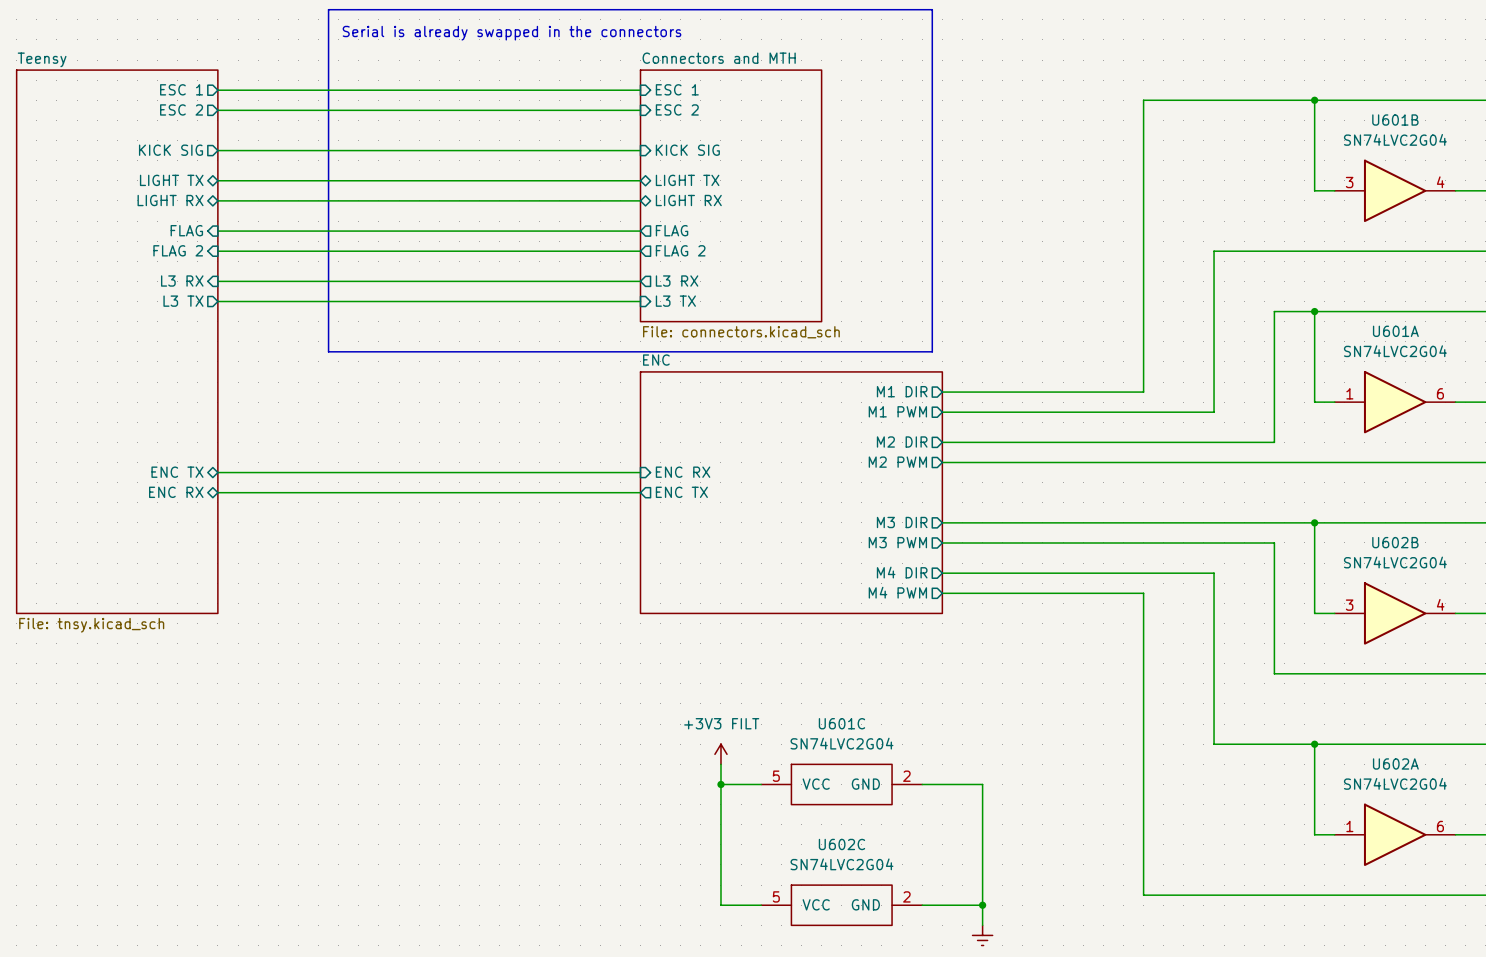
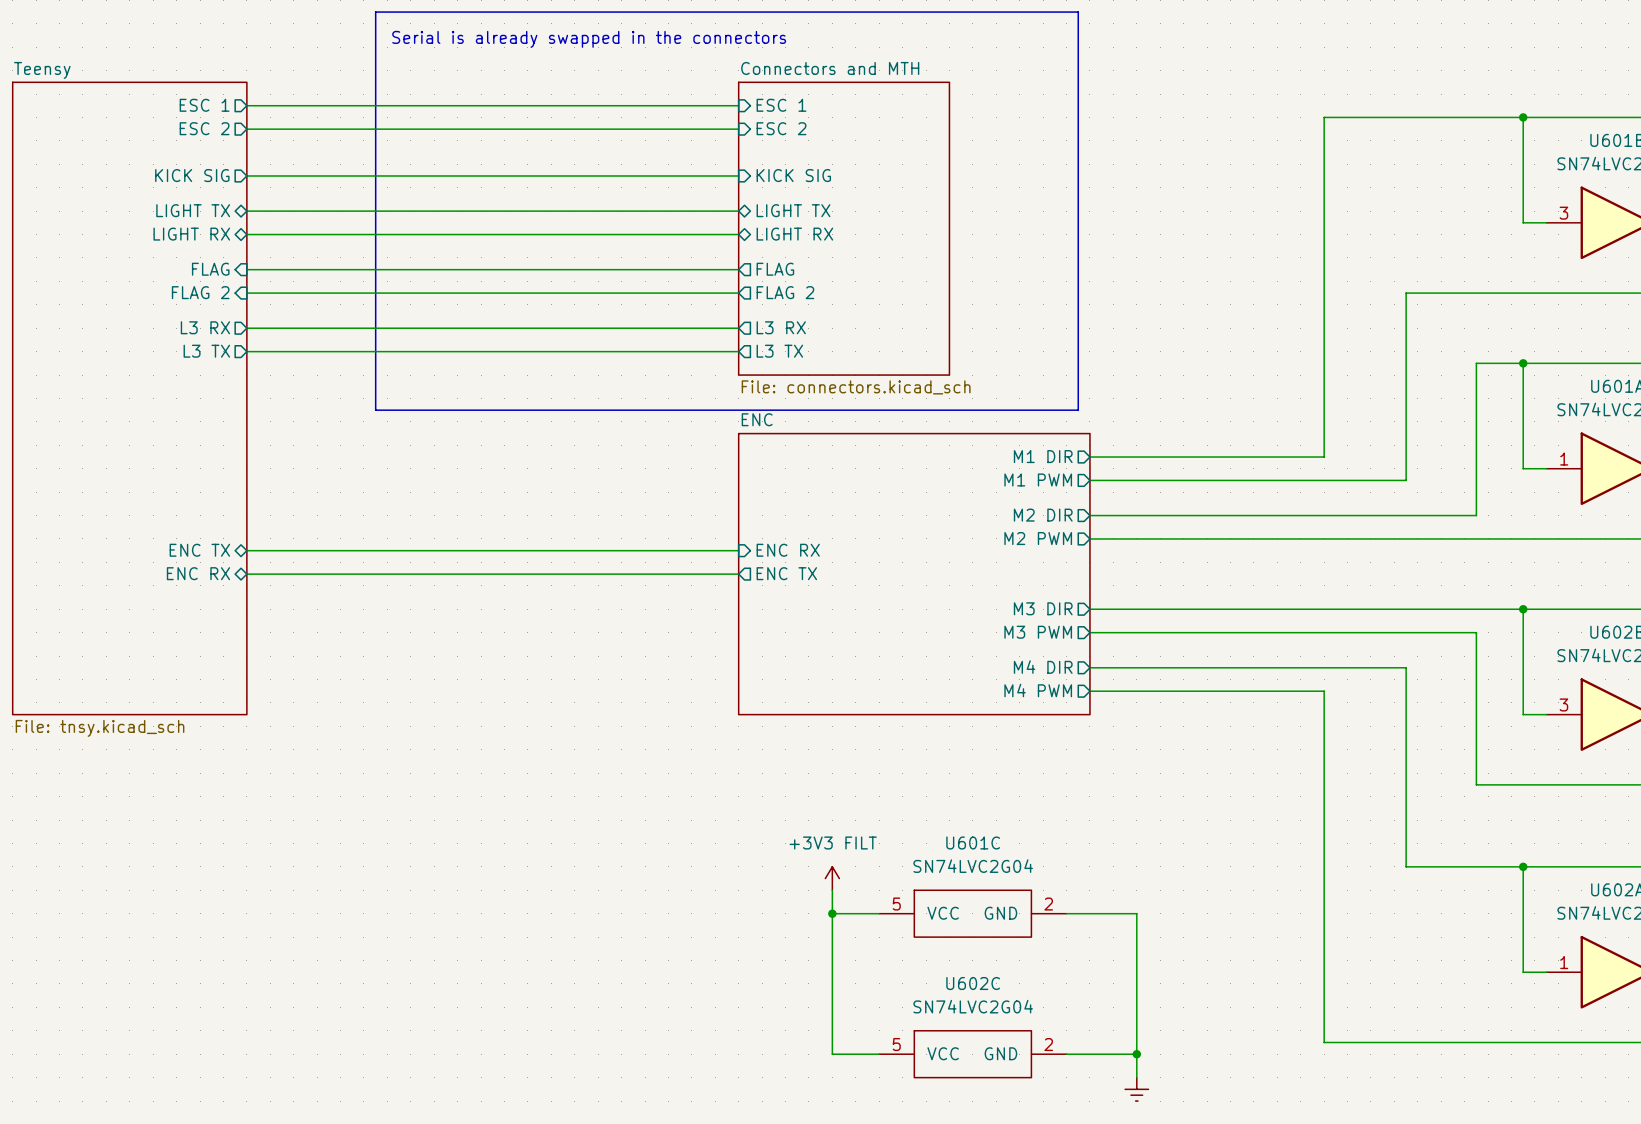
sheet pin shape: input (182, 281) -> output (205, 327)
sheet pin shape: input (675, 301) -> output (779, 351)

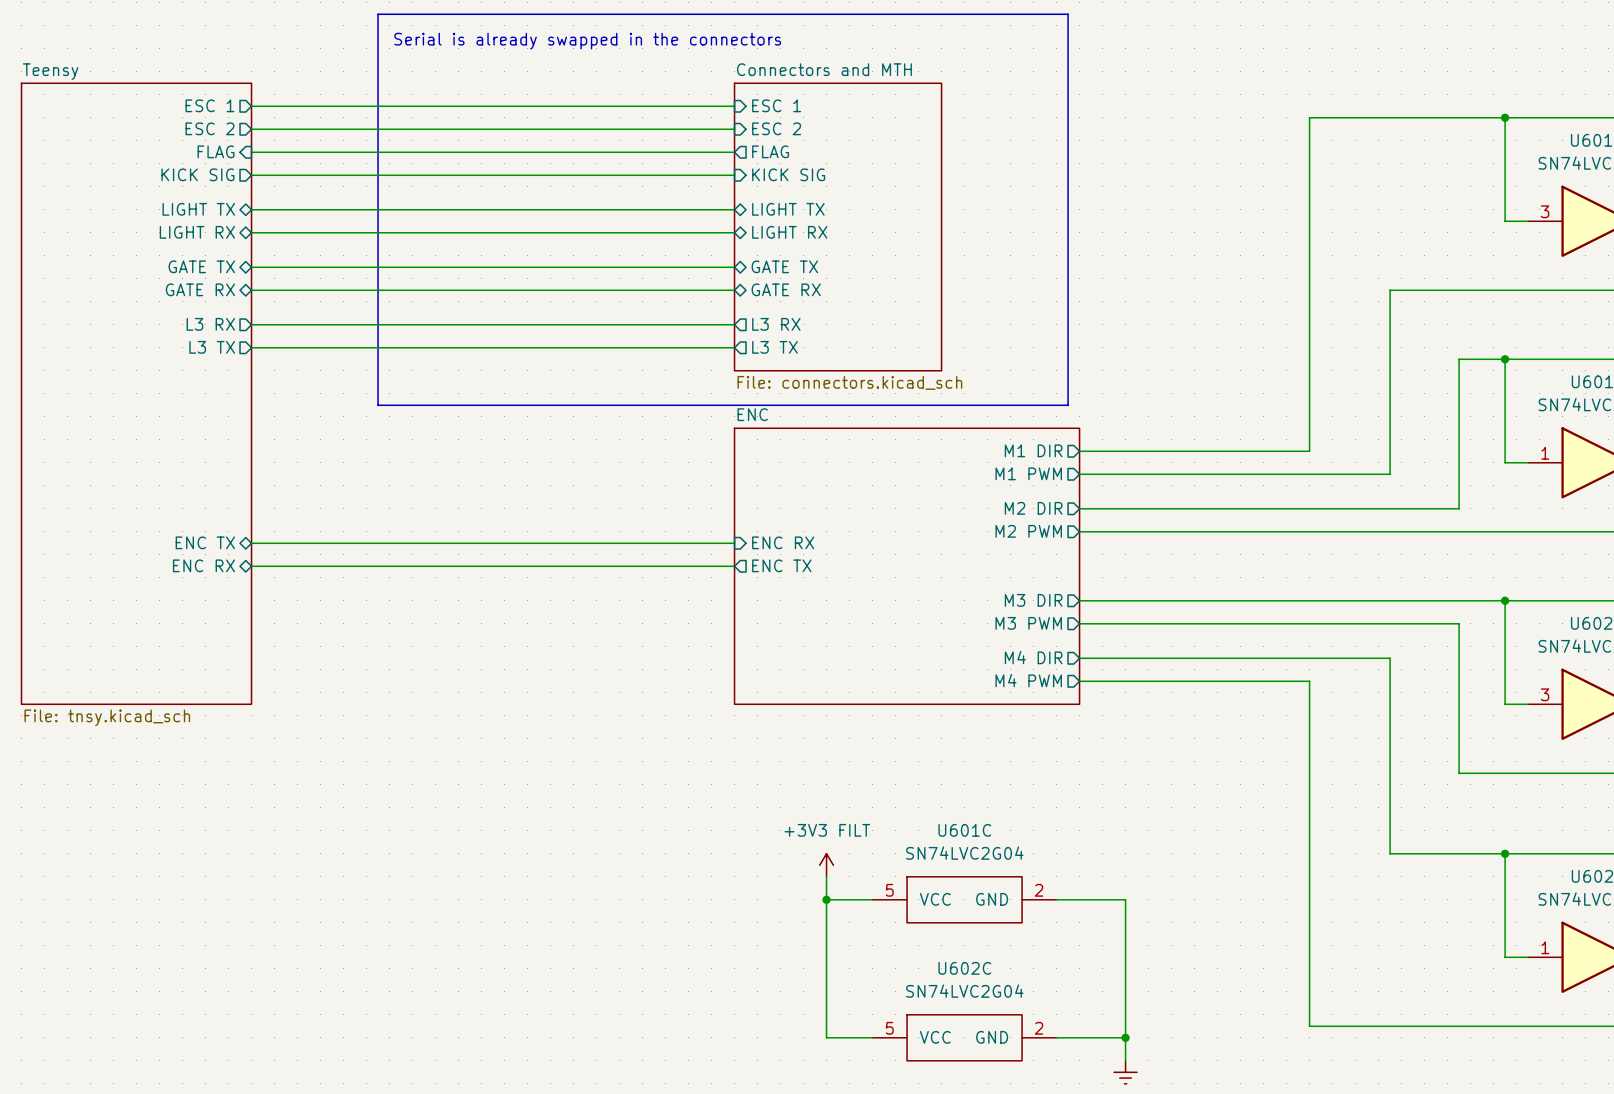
sheet pin: none -> FLAG (216, 151)
wire: none -> (251, 152) (734, 152)
sheet pin: none -> FLAG (770, 151)
sheet pin shape: input (210, 269) -> bidirectional (201, 266)
sheet pin: FLAG (210, 269) -> GATE TX (201, 266)
sheet pin shape: output (775, 269) -> bidirectional (784, 266)
sheet pin: FLAG (775, 269) -> GATE TX (784, 266)
sheet pin shape: input (200, 292) -> bidirectional (200, 289)
sheet pin: FLAG 2 (200, 292) -> GATE RX (200, 289)
sheet pin shape: output (785, 292) -> bidirectional (786, 289)
sheet pin: FLAG 2 (785, 292) -> GATE RX (786, 289)

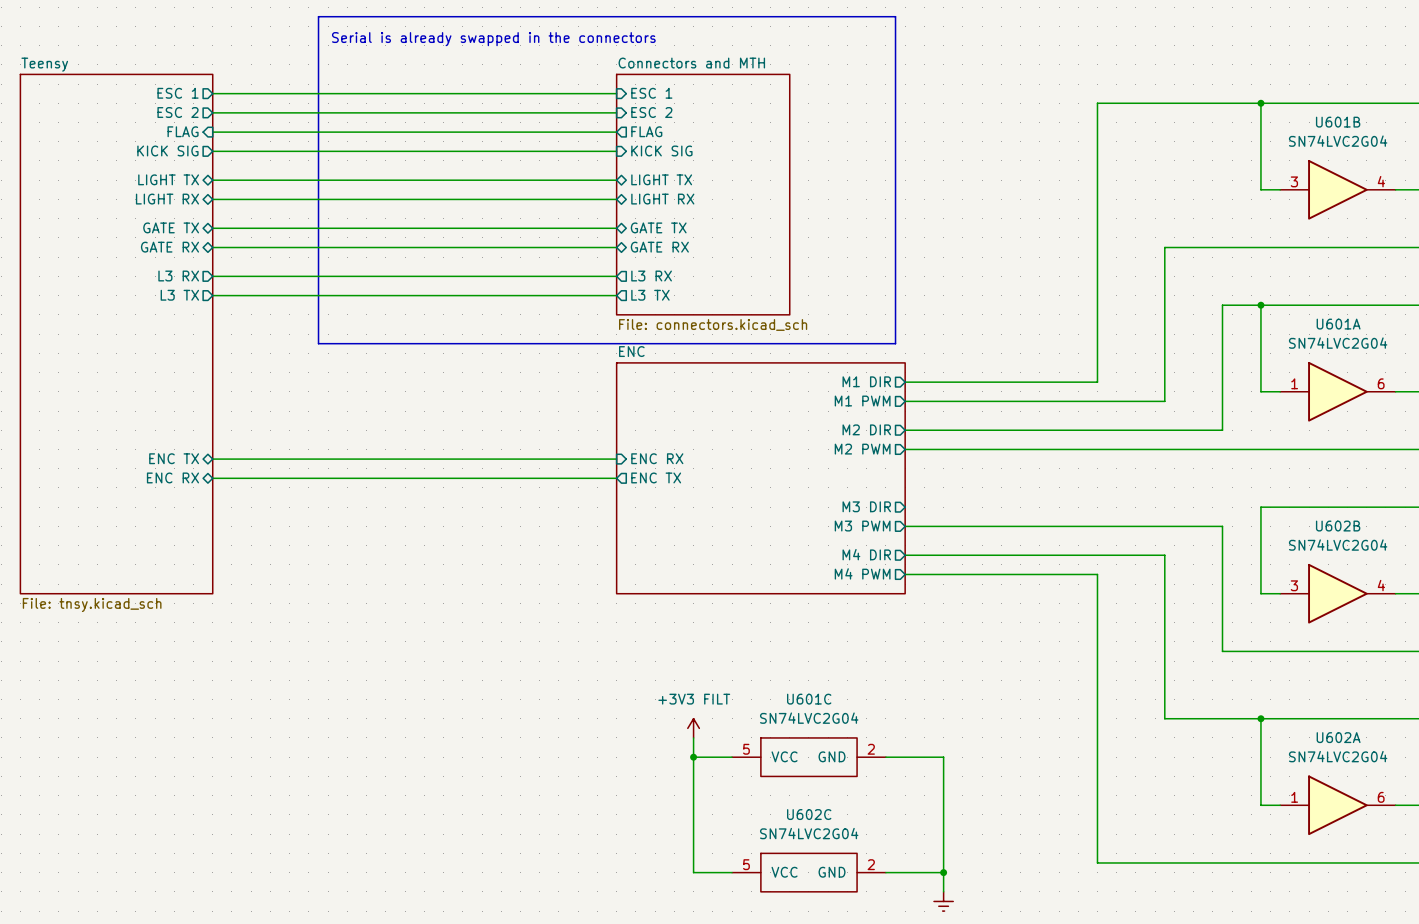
wire: (1079, 600) (1505, 600) -> none
junction: (1505, 600) -> none

